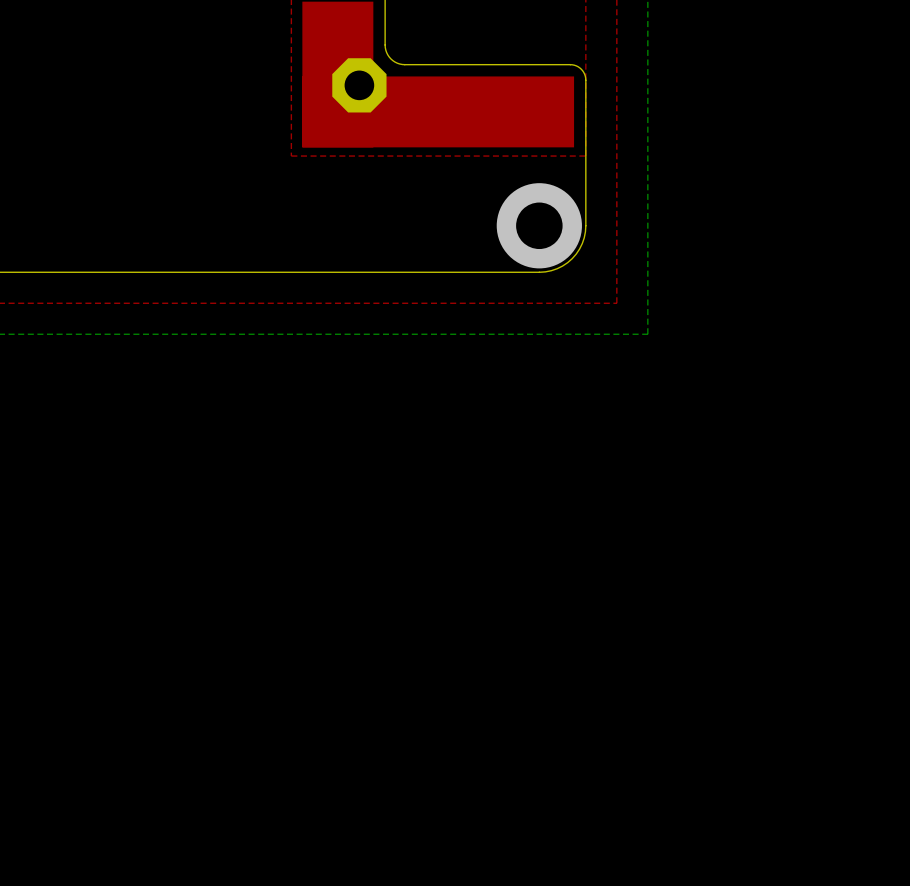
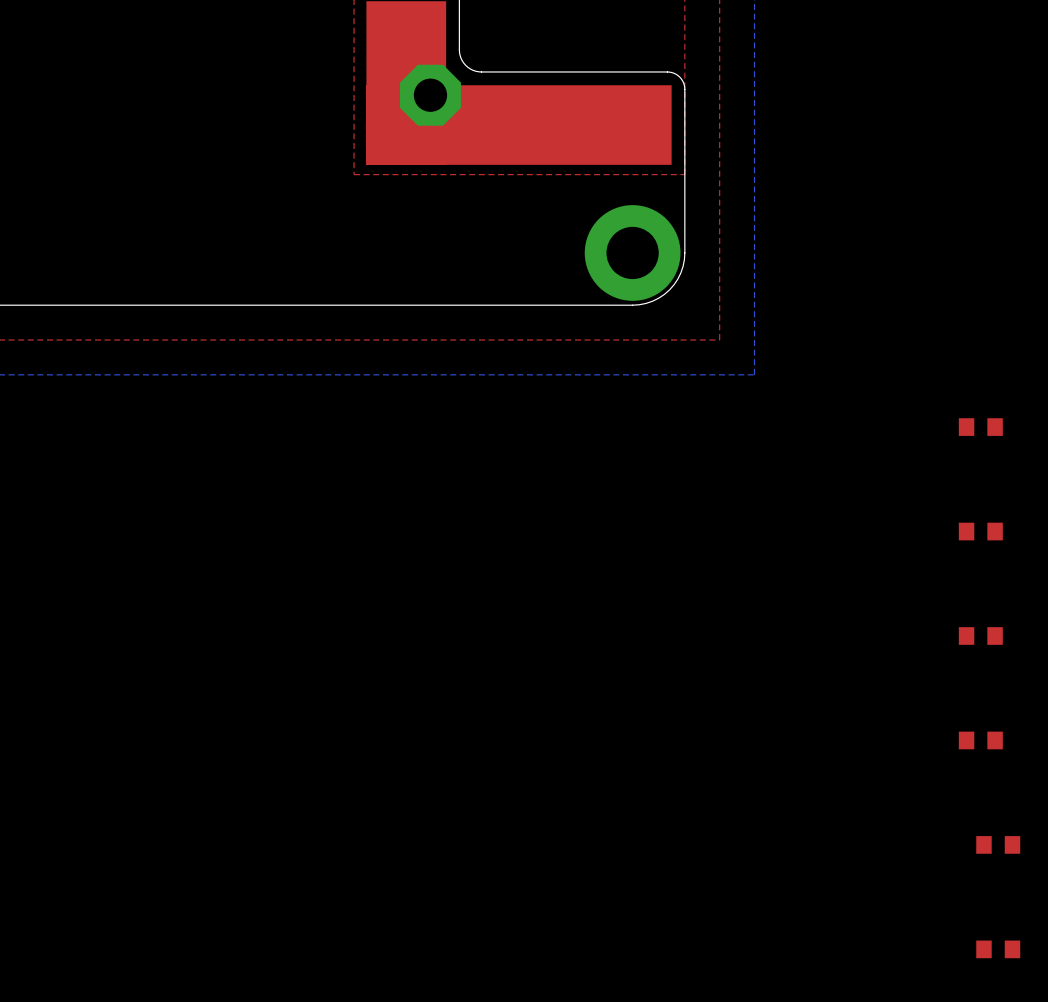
part: none -> (980, 427)
part: none -> (980, 531)
part: none -> (980, 636)
part: none -> (980, 740)
part: none -> (998, 844)
part: none -> (998, 949)

